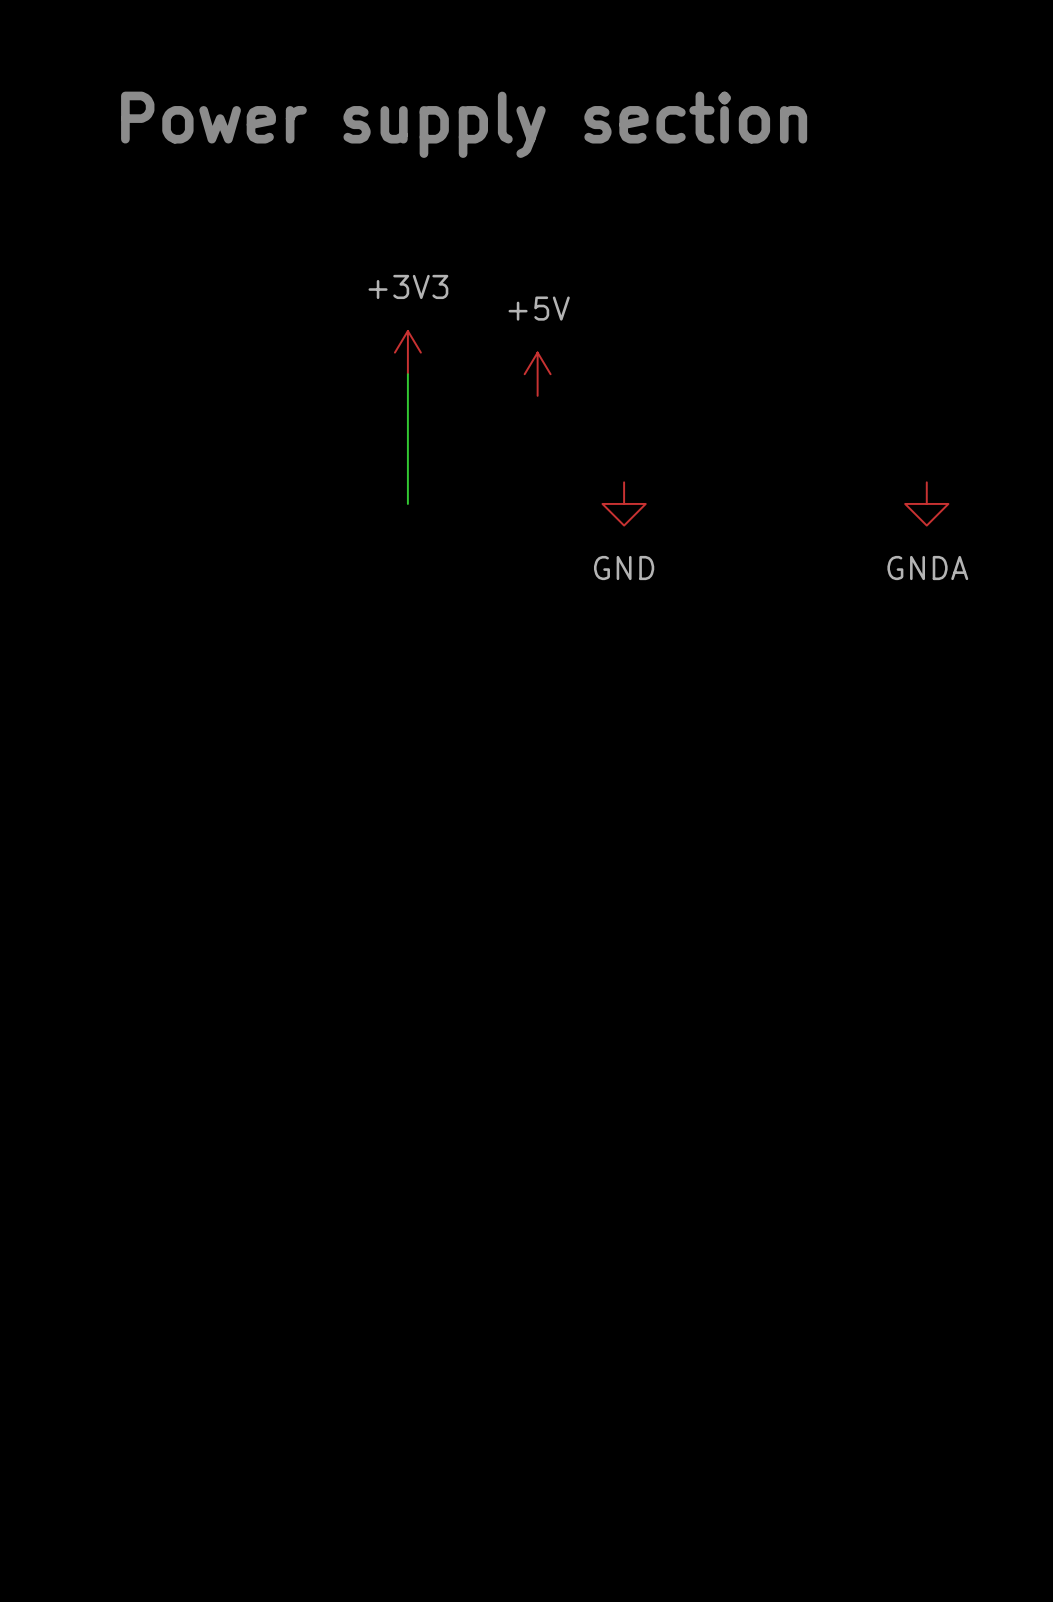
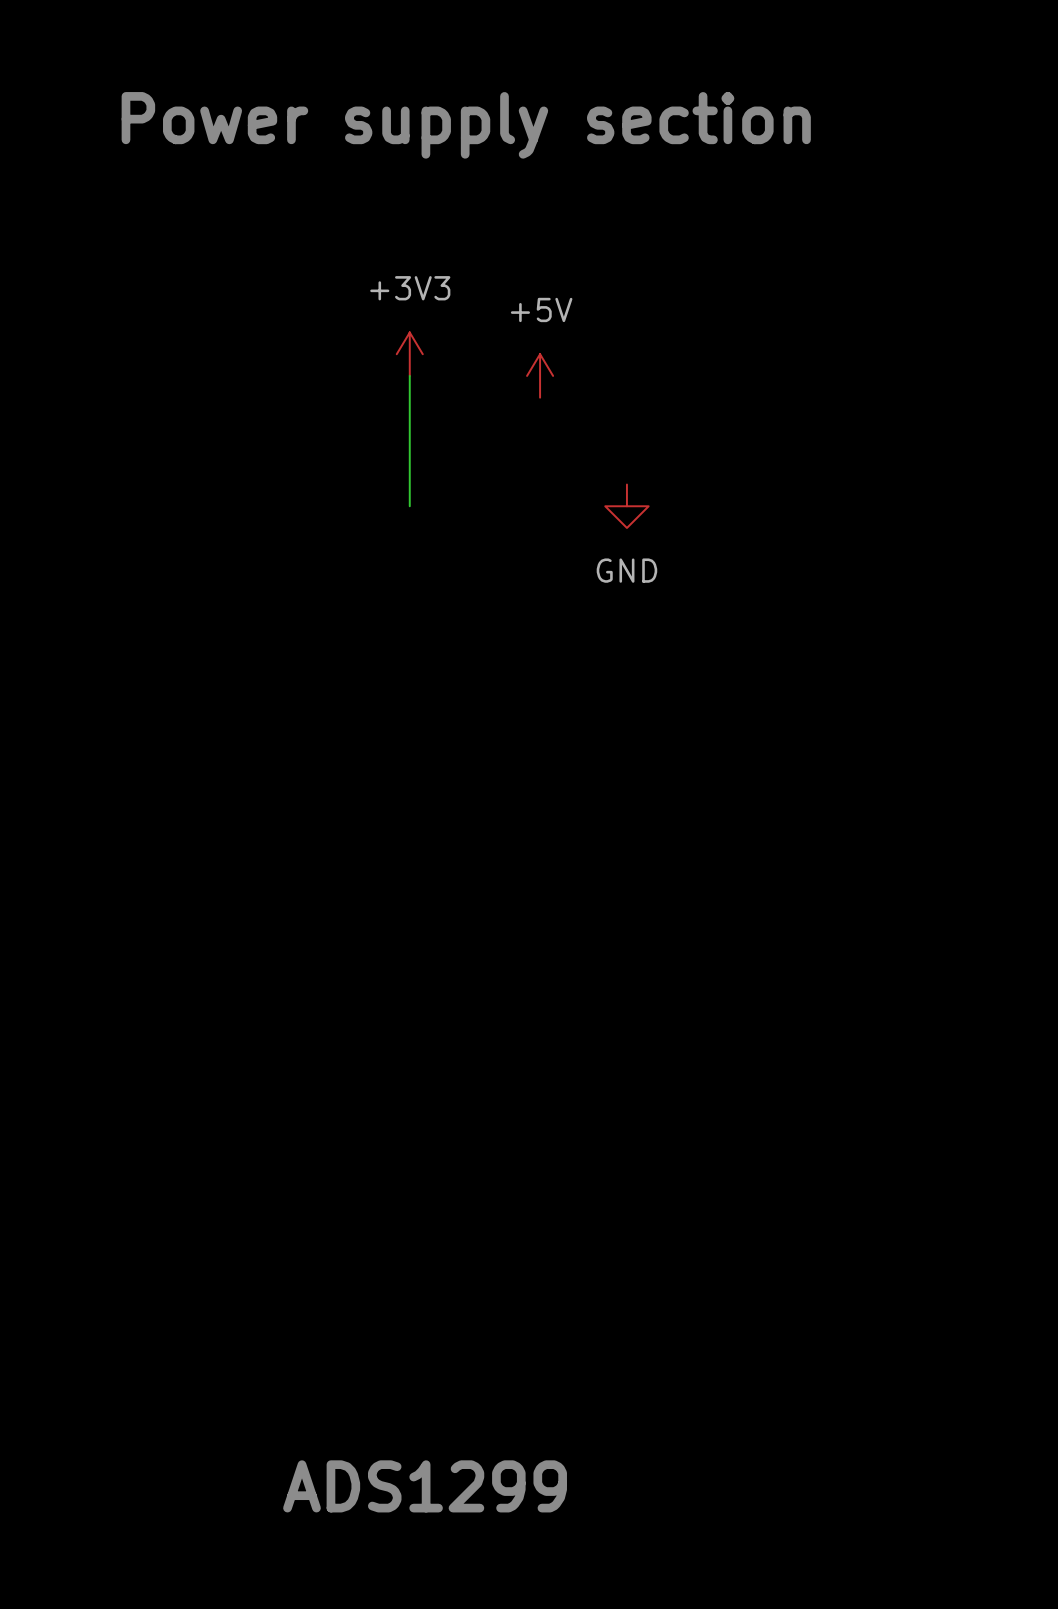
power symbol: GNDA (926, 503) -> none
text: none -> ADS1299 (425, 1486)

